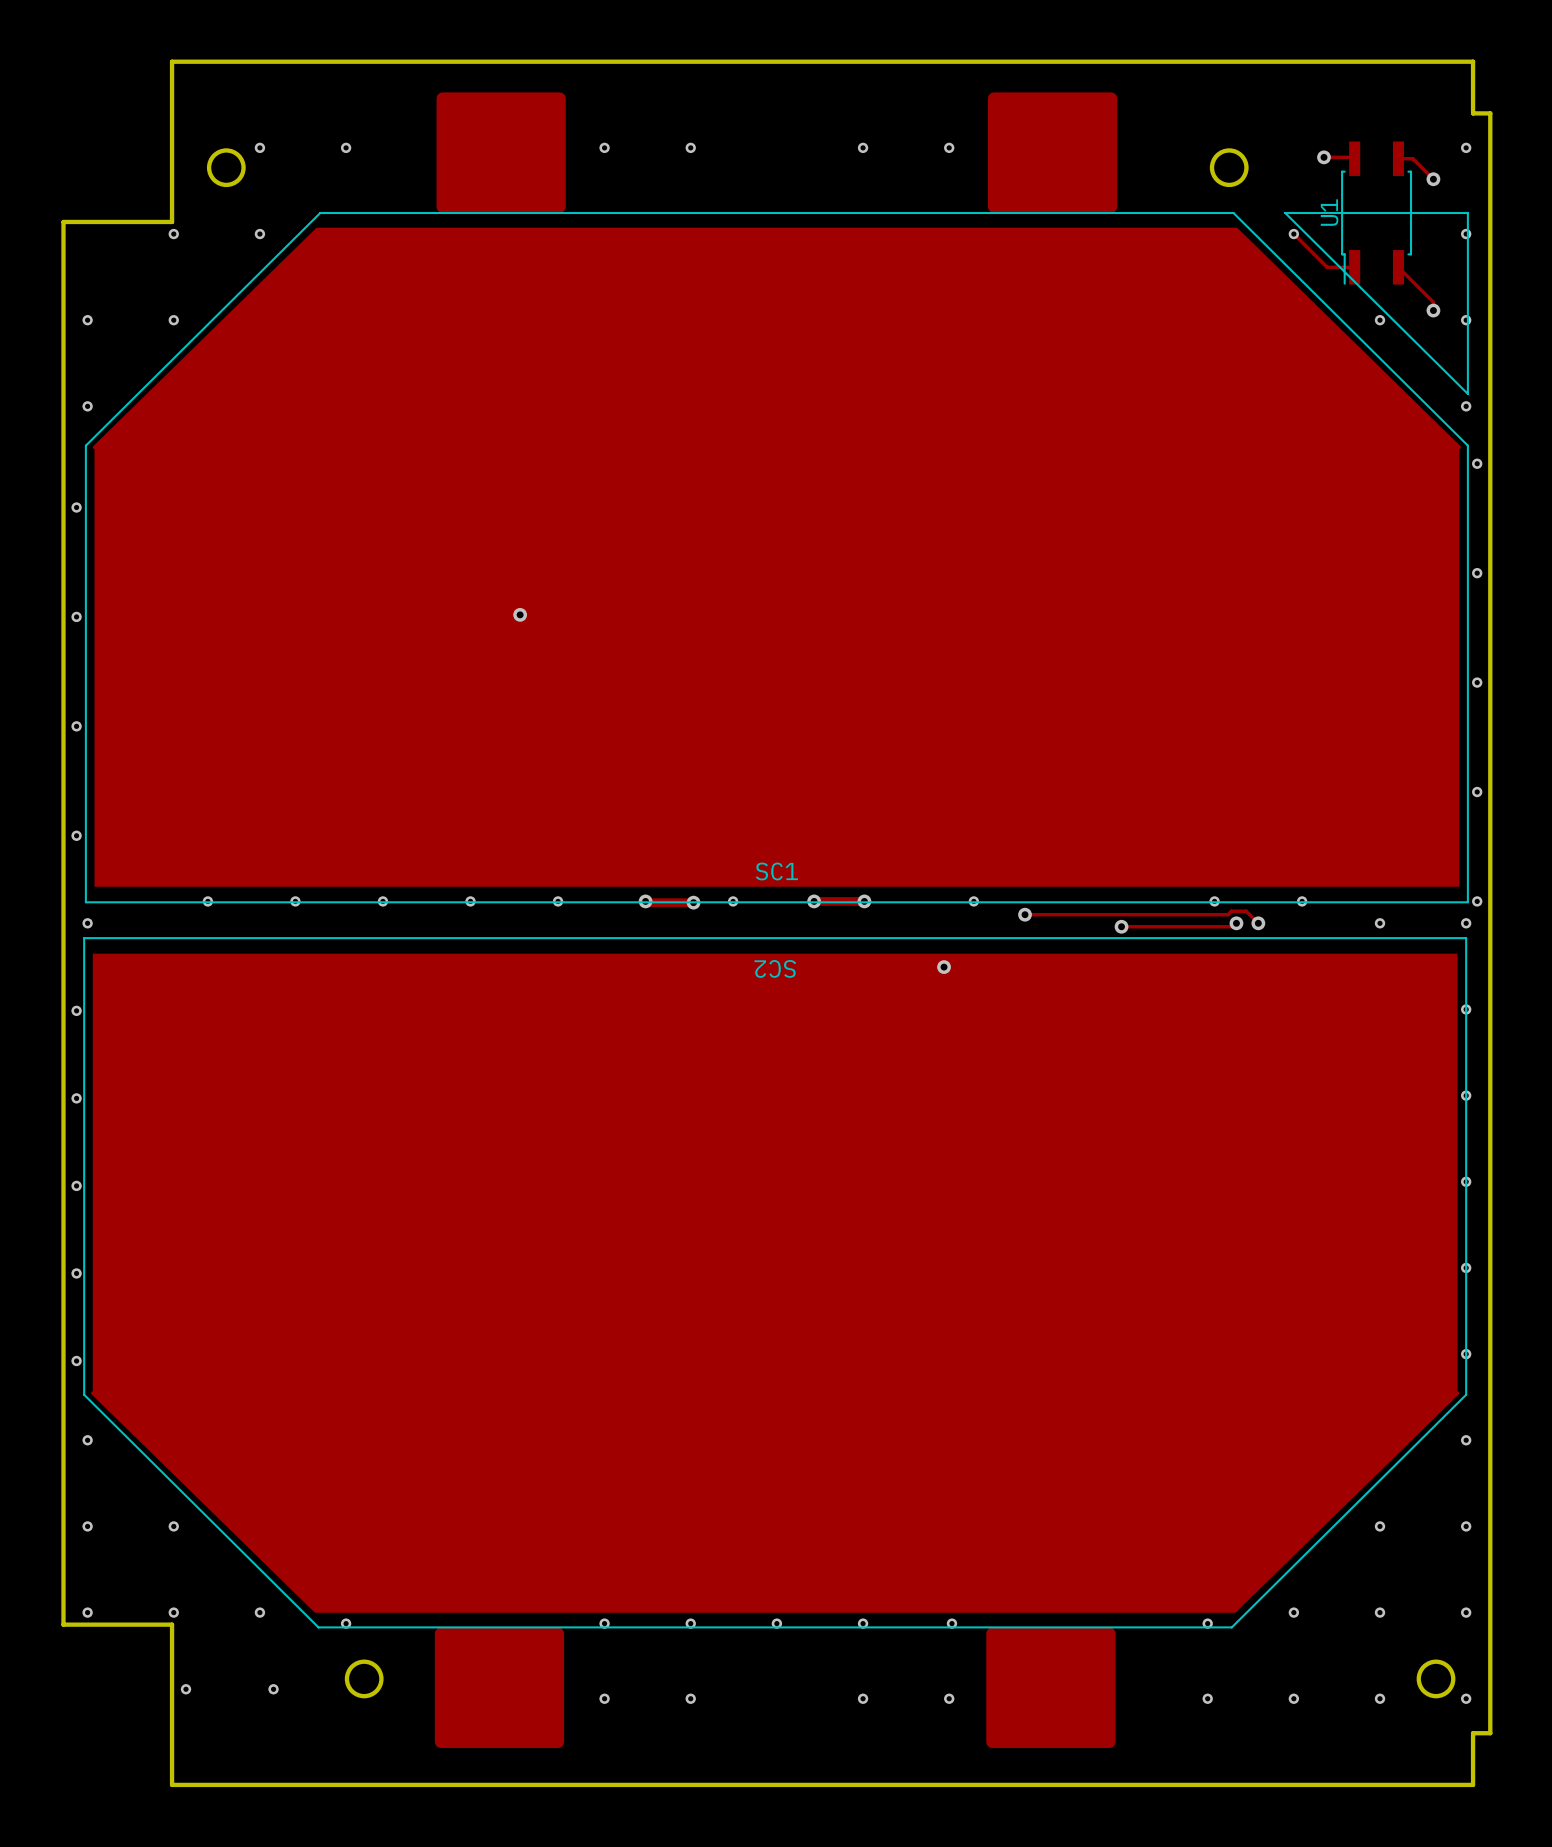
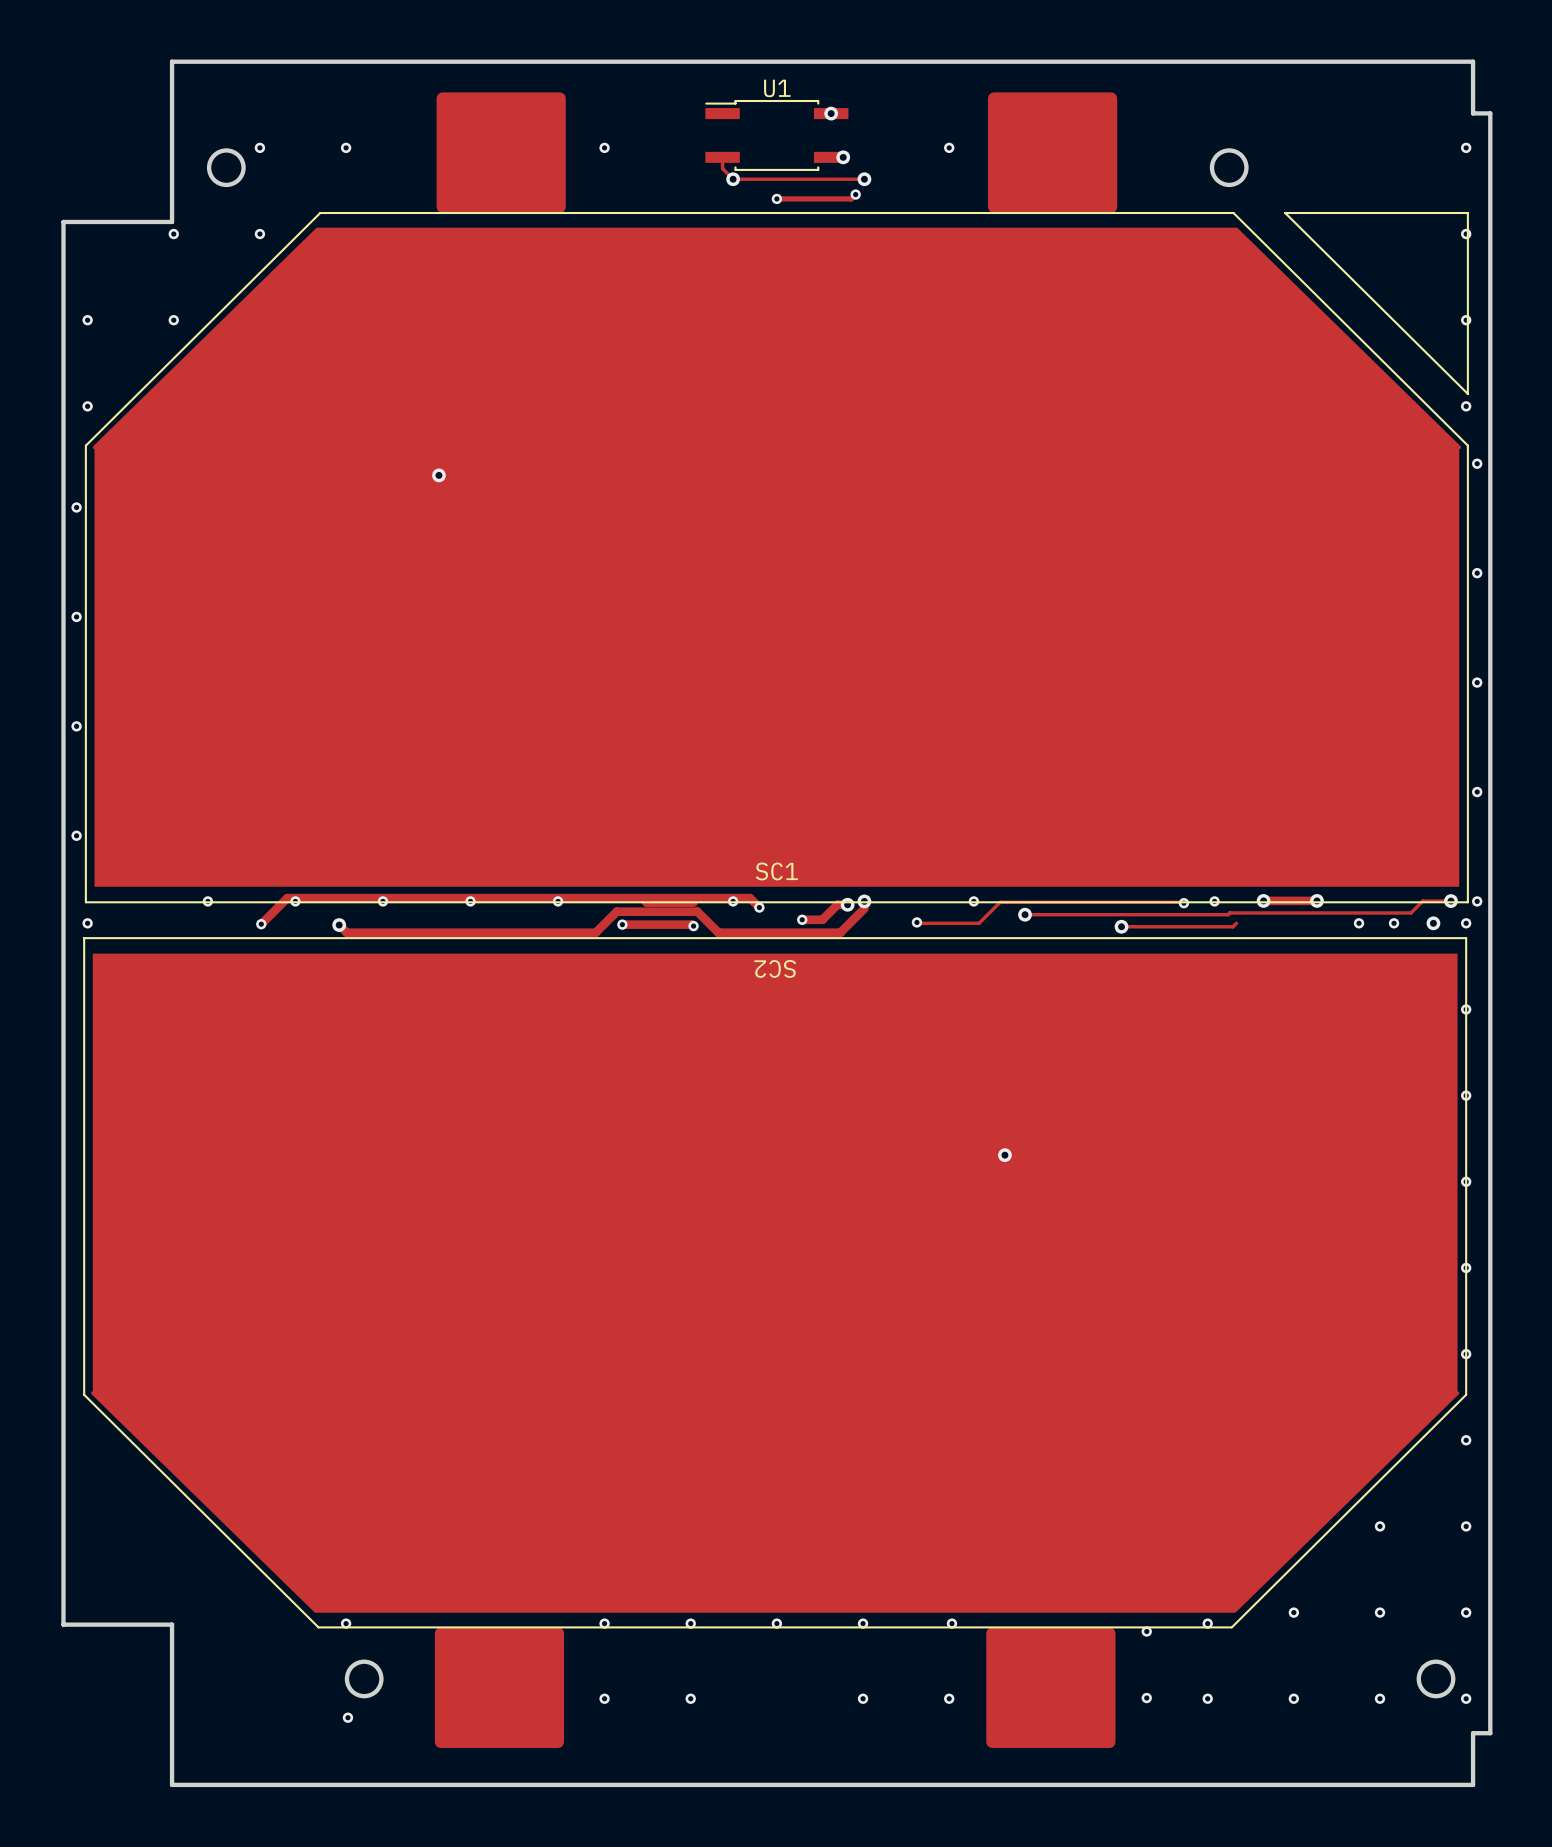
via: none -> (831, 113)
via: (690, 147) -> none
via position: (863, 147) -> (855, 194)
track: none -> (722, 157) (722, 168) (733, 179) (864, 179)
via: none -> (843, 157)
track: (1324, 157) (1354, 158) -> none
via: (1324, 157) -> none
track: (1398, 158) (1412, 158) (1433, 179) -> none
via: none -> (733, 179)
via: none -> (864, 179)
via: (1433, 179) -> none
track: none -> (855, 194) (851, 198) (776, 198)
via: none -> (776, 198)
U1 rotation: 0° (1376, 213) -> 90° clockwise (776, 135)
U1 position: (1376, 213) -> (776, 135)
track: (1293, 234) (1327, 267) (1354, 267) -> none
via: (1293, 234) -> none
track: (1398, 267) (1433, 302) (1433, 310) -> none
via: (1433, 310) -> none
via: (1380, 320) -> none
via: none -> (438, 475)
via: (520, 614) -> none
track: none -> (1263, 900) (1317, 900)
via: none -> (1263, 900)
via: none -> (1317, 900)
via: (645, 901) -> none
track: (814, 901) (864, 901) -> none
via position: (814, 901) -> (847, 904)
via: (1302, 901) -> none
via: none -> (1450, 901)
via: (693, 902) -> none
track: none -> (1183, 903) (1000, 902) (979, 923) (916, 922)
via: none -> (1183, 903)
track: none -> (847, 904) (837, 904) (822, 919) (802, 919)
track: none -> (759, 907) (749, 898) (287, 898) (261, 924)
via: none -> (759, 907)
track: none -> (864, 908) (840, 932) (718, 932) (697, 911) (616, 911) (595, 932) (346, 932) (339, 925)
track: (1229, 912) (1231, 911) (1246, 911) (1258, 923) -> (1229, 912) (1411, 912) (1422, 901) (1450, 901)
via: none -> (802, 919)
via: none -> (916, 922)
via: (1236, 923) -> none
via: (1258, 923) -> none
via: none -> (1359, 923)
via: (1380, 923) -> none
via: none -> (1394, 923)
via: none -> (1433, 923)
via: none -> (261, 924)
track: none -> (622, 924) (693, 926)
via: none -> (622, 924)
via: none -> (339, 925)
via: none -> (693, 926)
via: (944, 967) -> none
via: (76, 1010) -> none
via: (76, 1098) -> none
via: none -> (1004, 1155)
via: (76, 1185) -> none
via: (76, 1273) -> none
via: (76, 1361) -> none
via: (87, 1440) -> none
via: (87, 1526) -> none
via: (173, 1526) -> none
via: (87, 1612) -> none
via: (173, 1612) -> none
via: (259, 1612) -> none
via: none -> (1146, 1631)
via: (186, 1689) -> none
via: (273, 1689) -> none
via: none -> (1146, 1698)
via: none -> (347, 1717)

